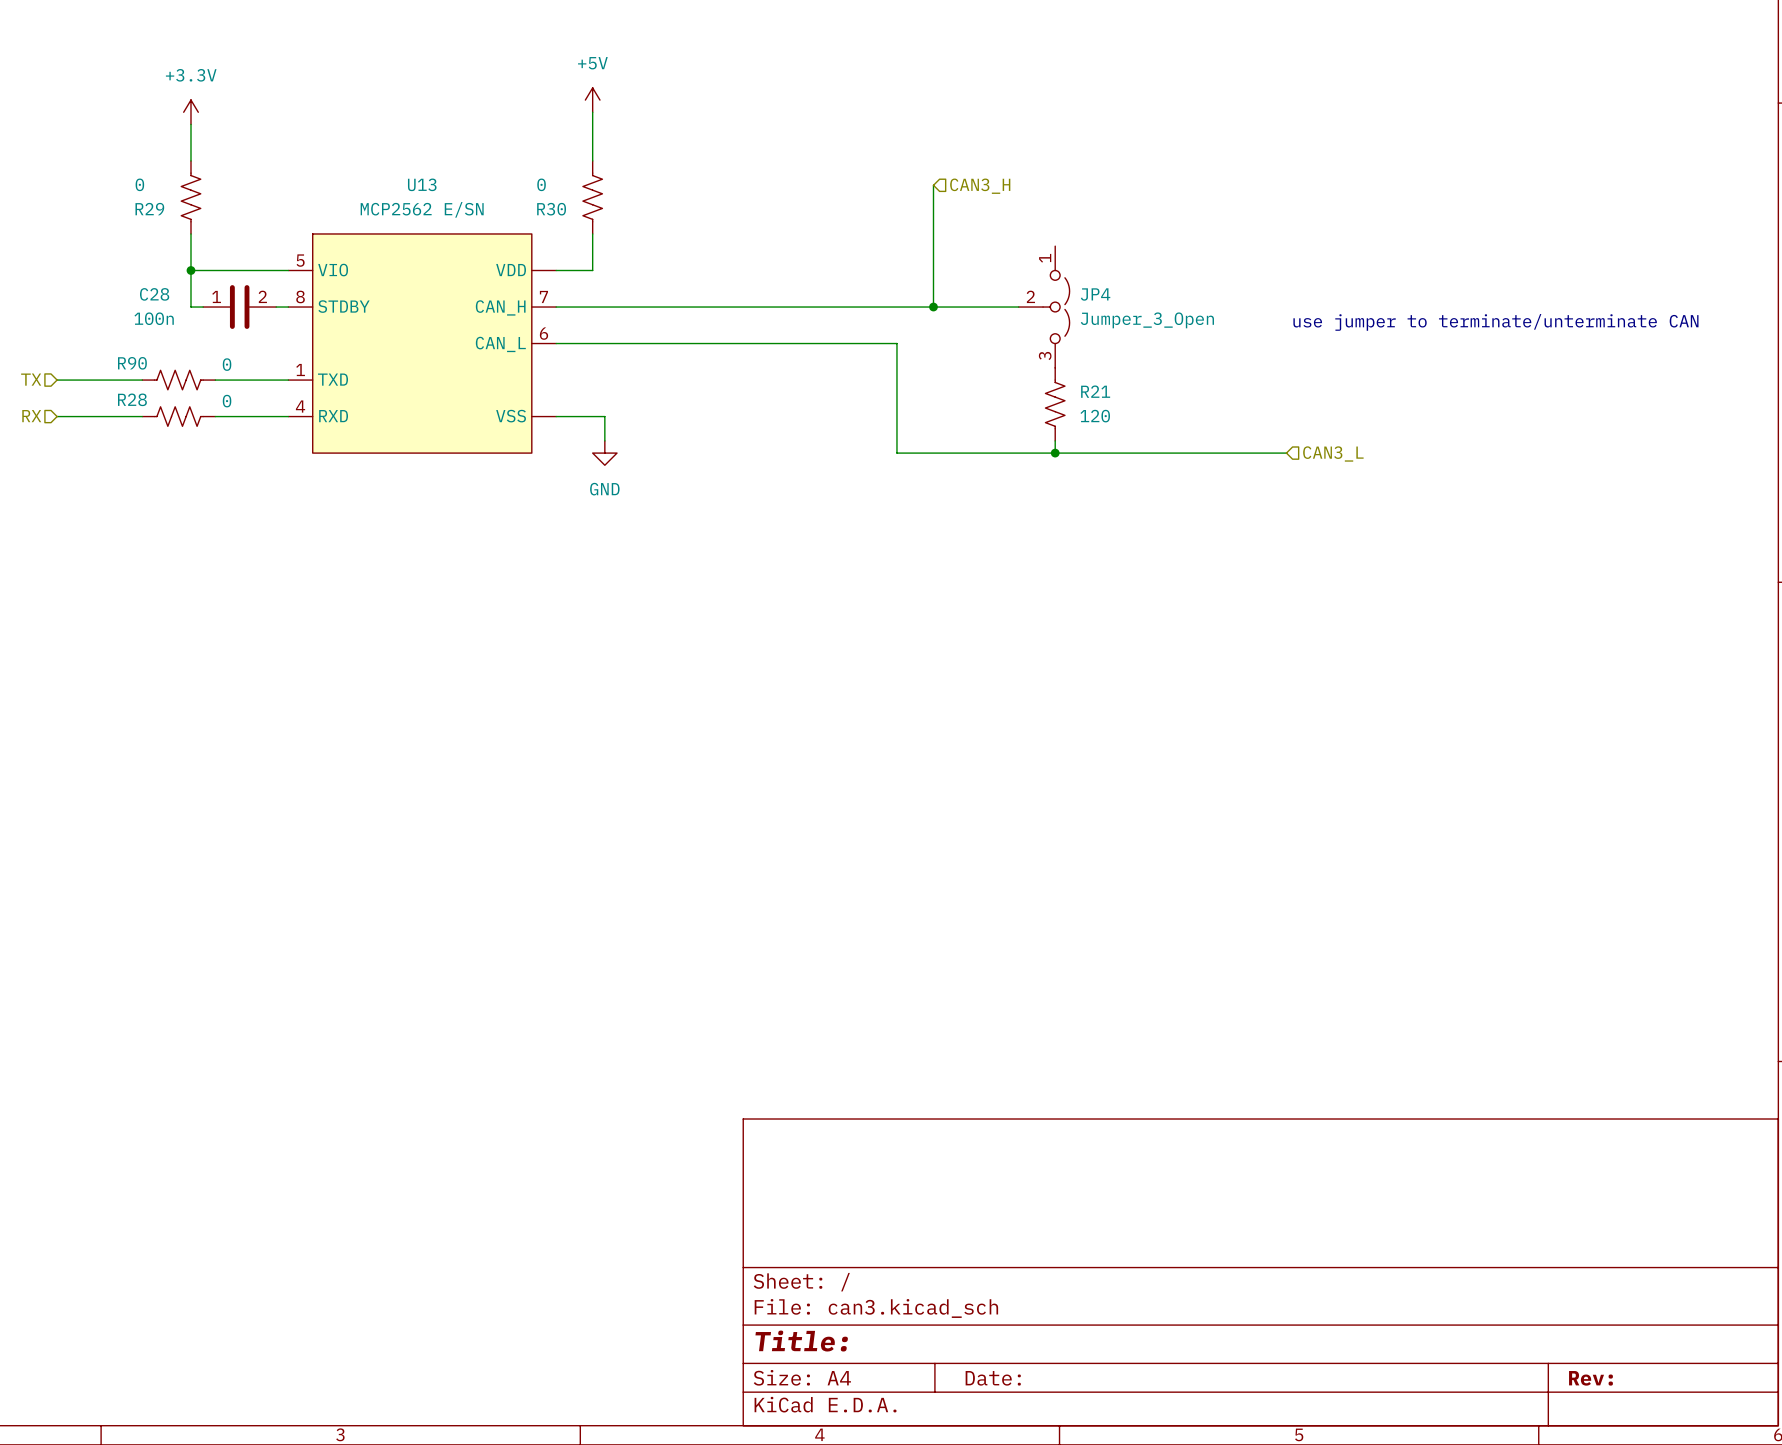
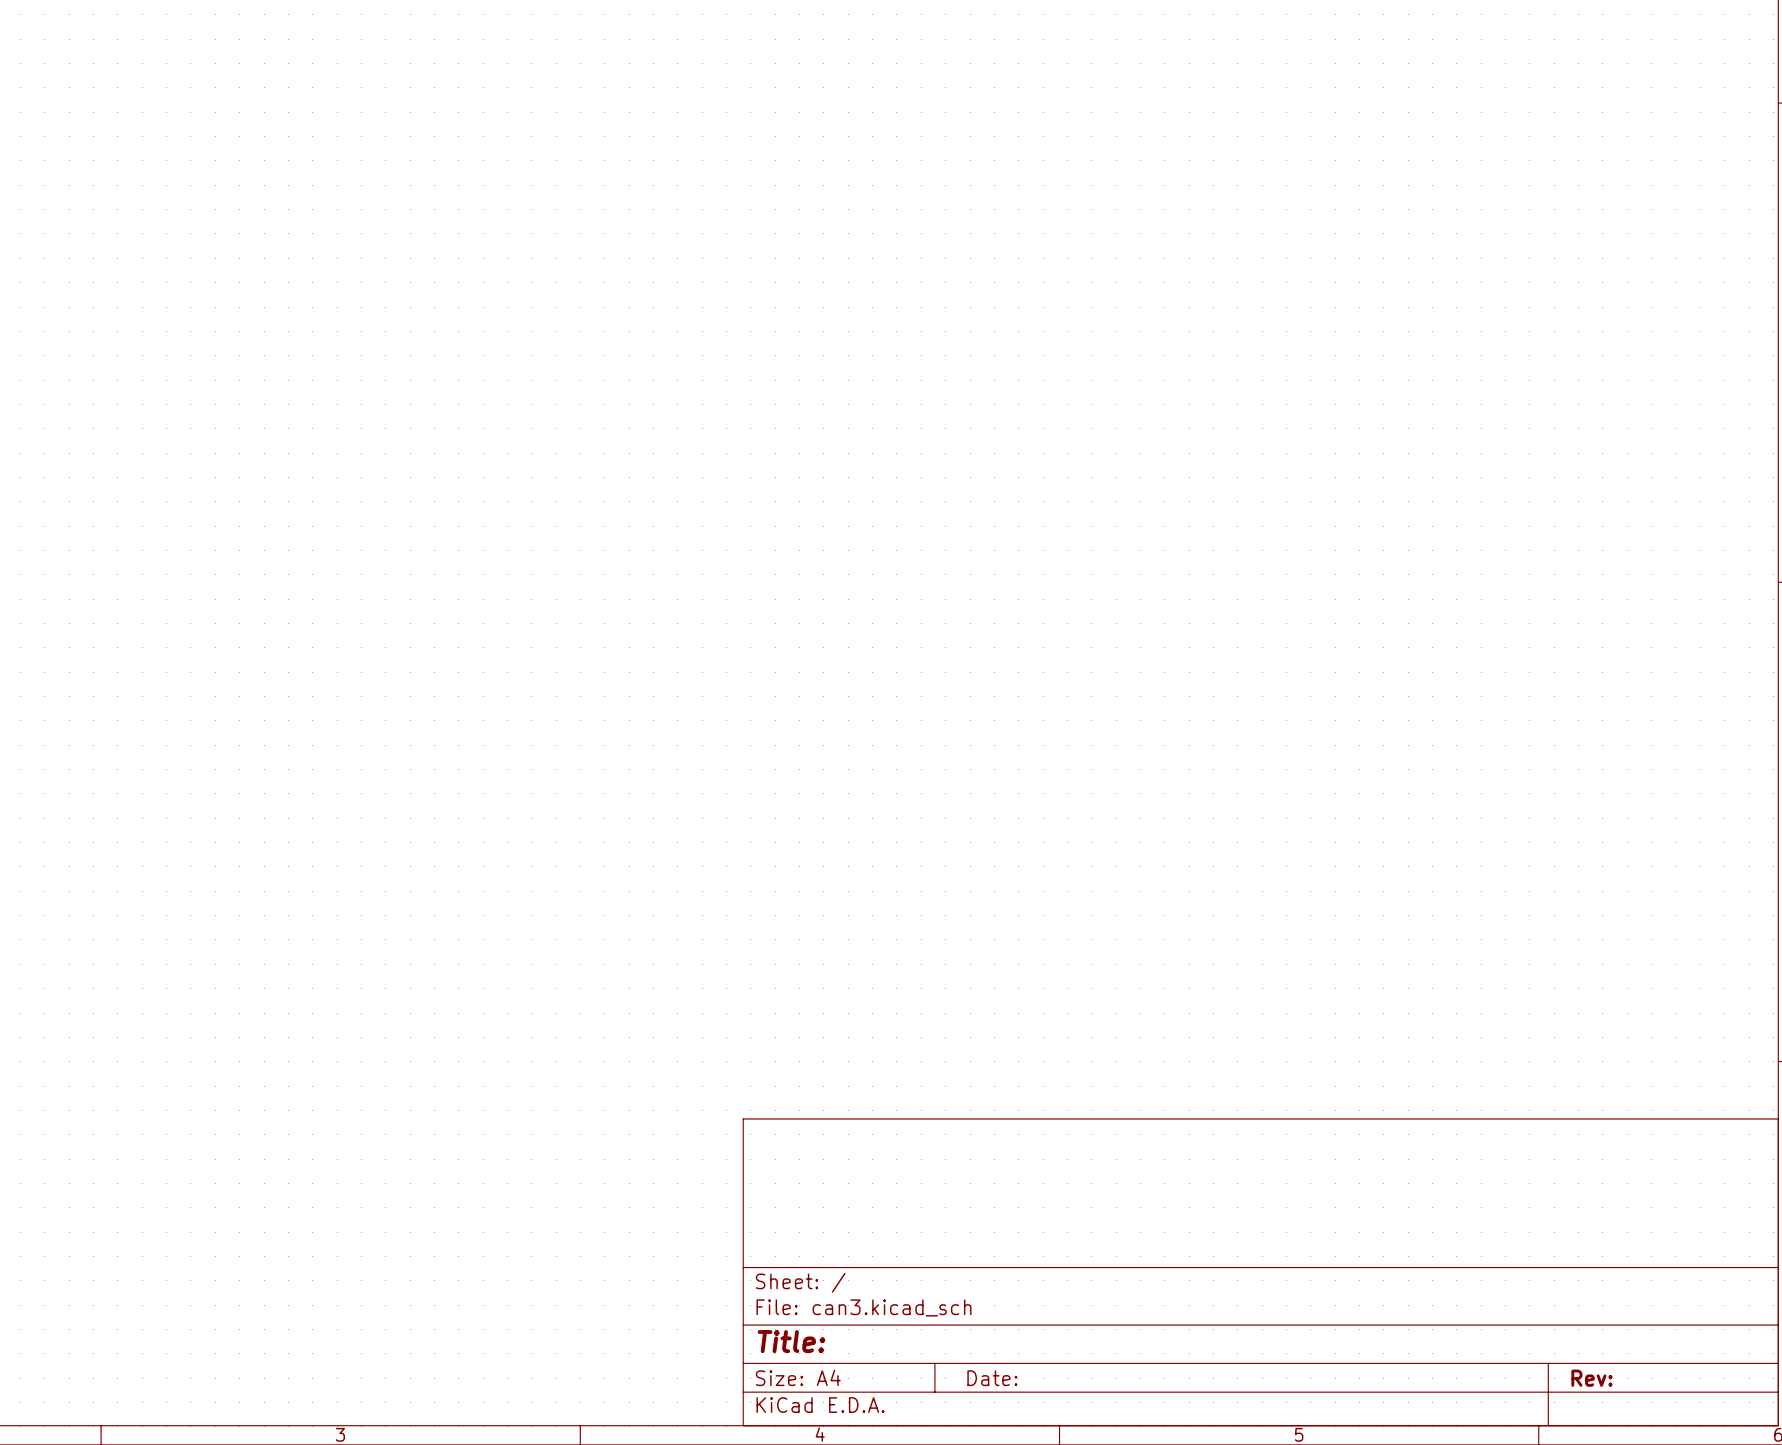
power symbol: +5V (592, 100) -> none
power symbol: +3.3V (190, 112) -> none
wire: (592, 112) (592, 160) -> none
wire: (190, 124) (190, 160) -> none
wire: (933, 185) (933, 307) -> none
hierarchical label: CAN3_H (980, 186) -> none
R29: 0 (190, 197) -> none
R30: 0 (592, 197) -> none
wire: (190, 233) (190, 307) (203, 307) -> none
wire: (592, 233) (592, 270) (556, 270) -> none
wire: (190, 270) (288, 270) -> none
junction: (190, 270) -> none
C28: 100n (239, 307) -> none
wire: (276, 307) (288, 307) -> none
wire: (556, 307) (1018, 307) -> none
junction: (933, 307) -> none
JP4: Jumper_3_Open (1044, 307) -> none
text: use jumper to terminate/unterminate CAN (1495, 322) -> none
U13: MCP2562 E/SN (422, 343) -> none
wire: (556, 343) (896, 343) (896, 453) (1286, 453) -> none
hierarchical label: TX (31, 379) -> none
wire: (57, 380) (142, 380) -> none
R90: 0 (178, 380) -> none
wire: (215, 380) (288, 380) -> none
R21: 120 (1055, 404) -> none
hierarchical label: RX (31, 416) -> none
wire: (57, 416) (142, 416) -> none
R28: 0 (178, 416) -> none
wire: (215, 416) (288, 416) -> none
wire: (556, 416) (604, 416) (604, 440) -> none
wire: (1055, 440) (1055, 453) -> none
power symbol: GND (604, 453) -> none
junction: (1055, 453) -> none
hierarchical label: CAN3_L (1333, 454) -> none

